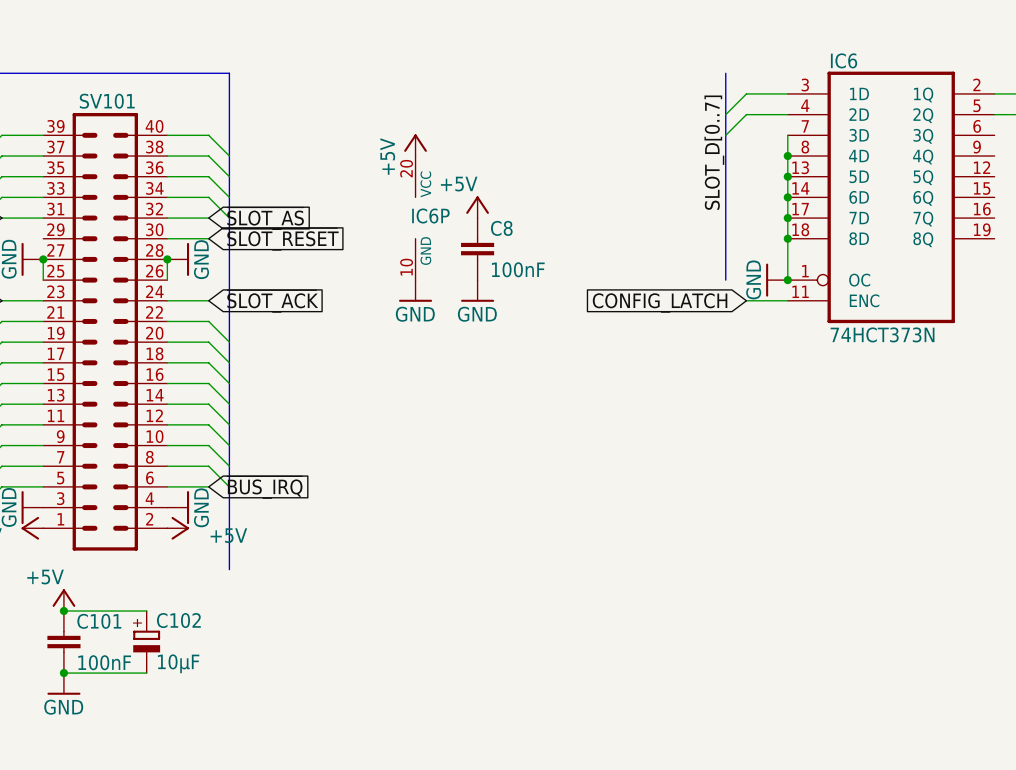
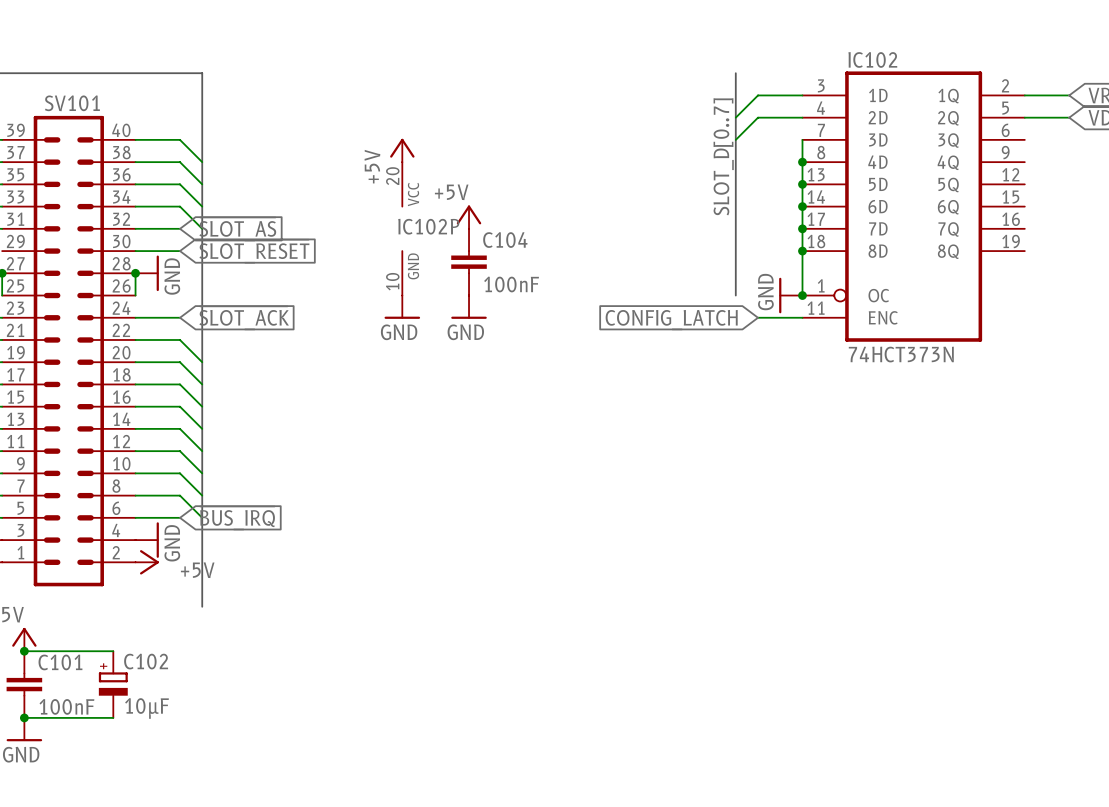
IC6 name: IC6 (844, 60) -> IC102 (872, 59)
IC6P name: IC6P (430, 216) -> IC102P (428, 226)
C8 name: C8 (501, 228) -> C104 (505, 240)

